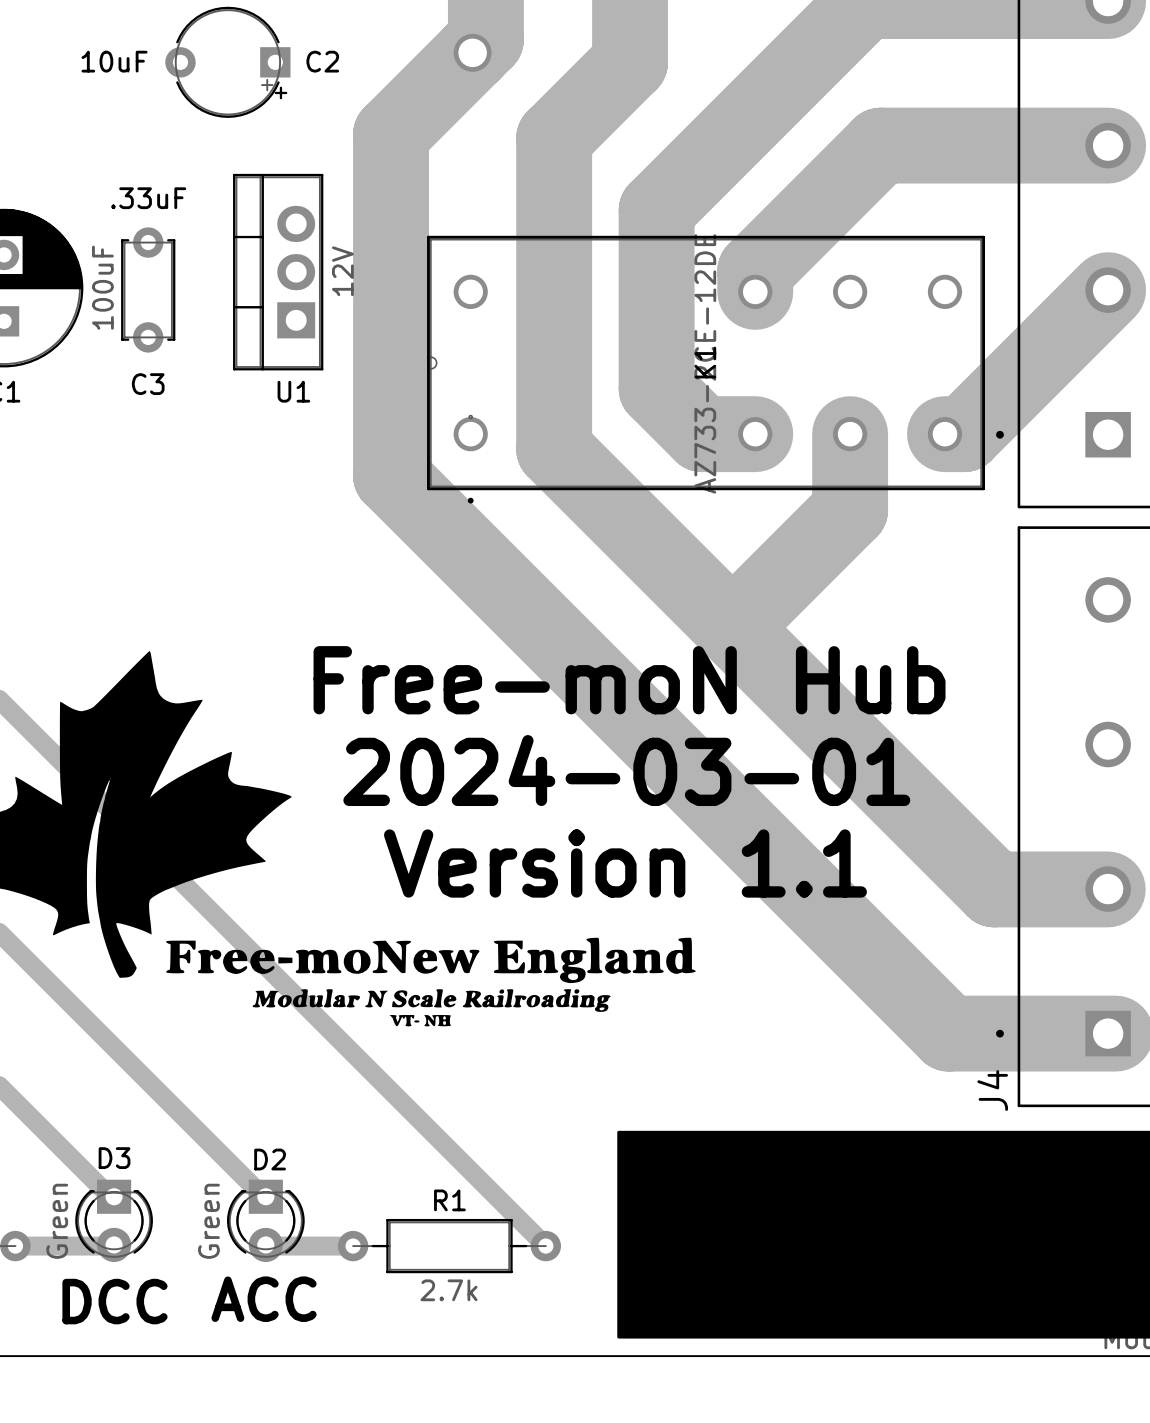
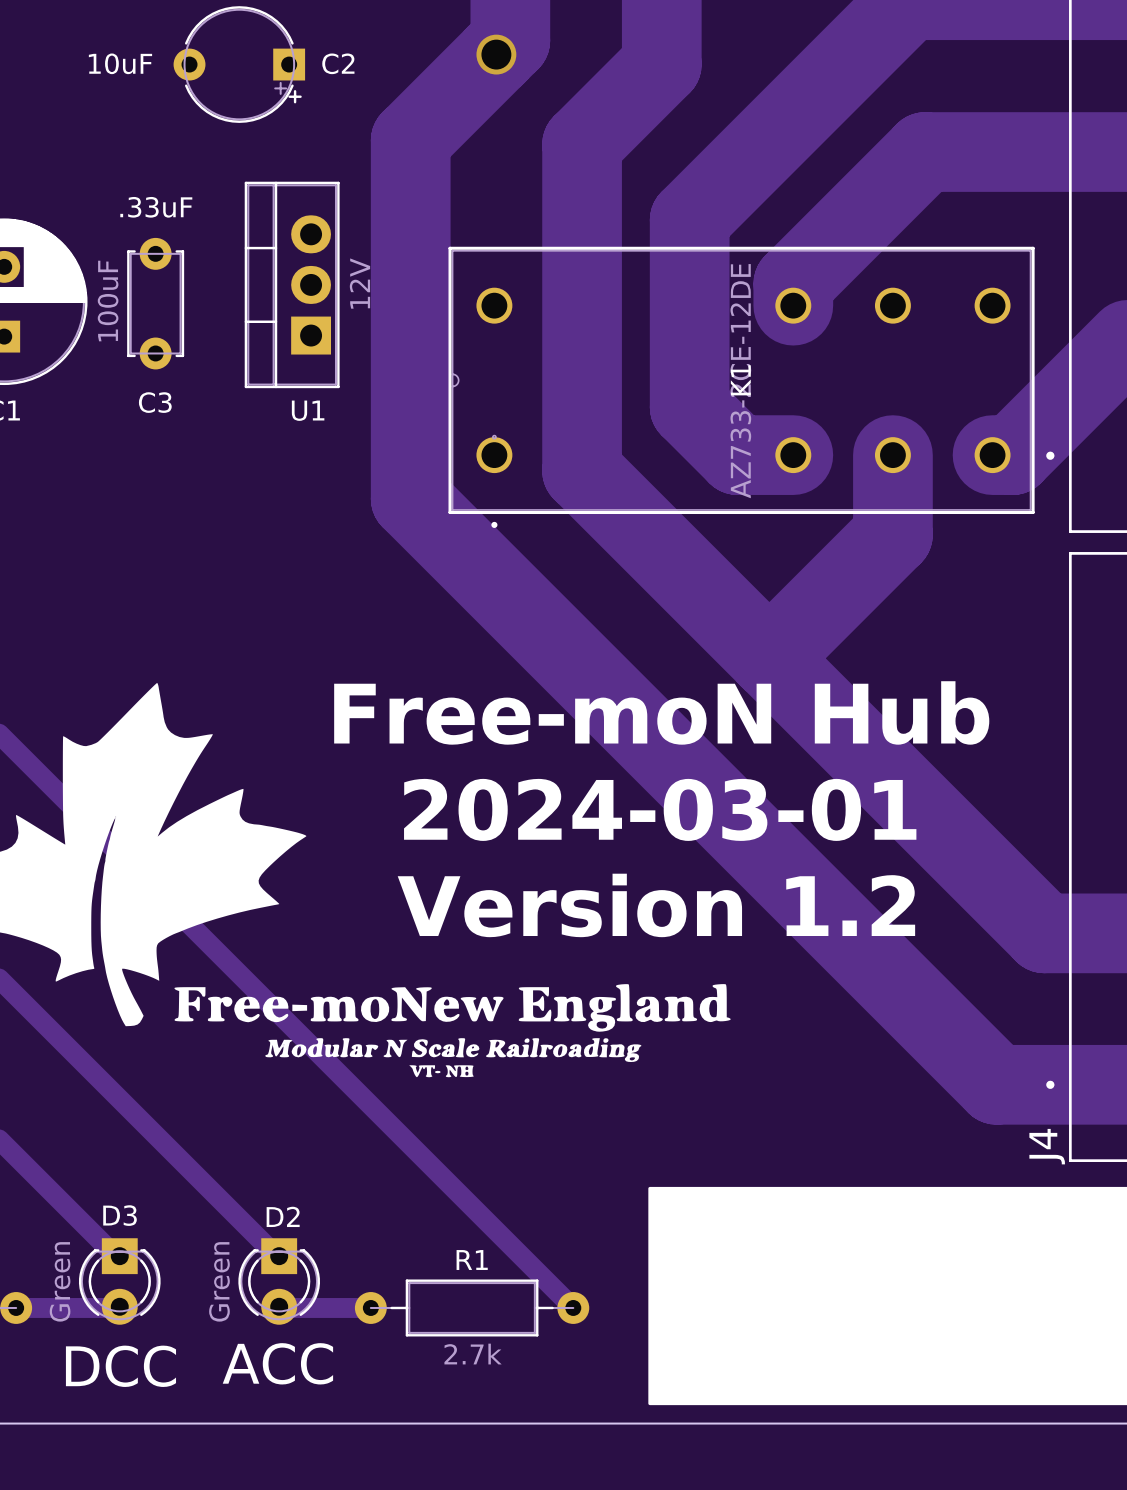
text: Version 1.1 (625, 863) -> Version 1.2 (656, 905)

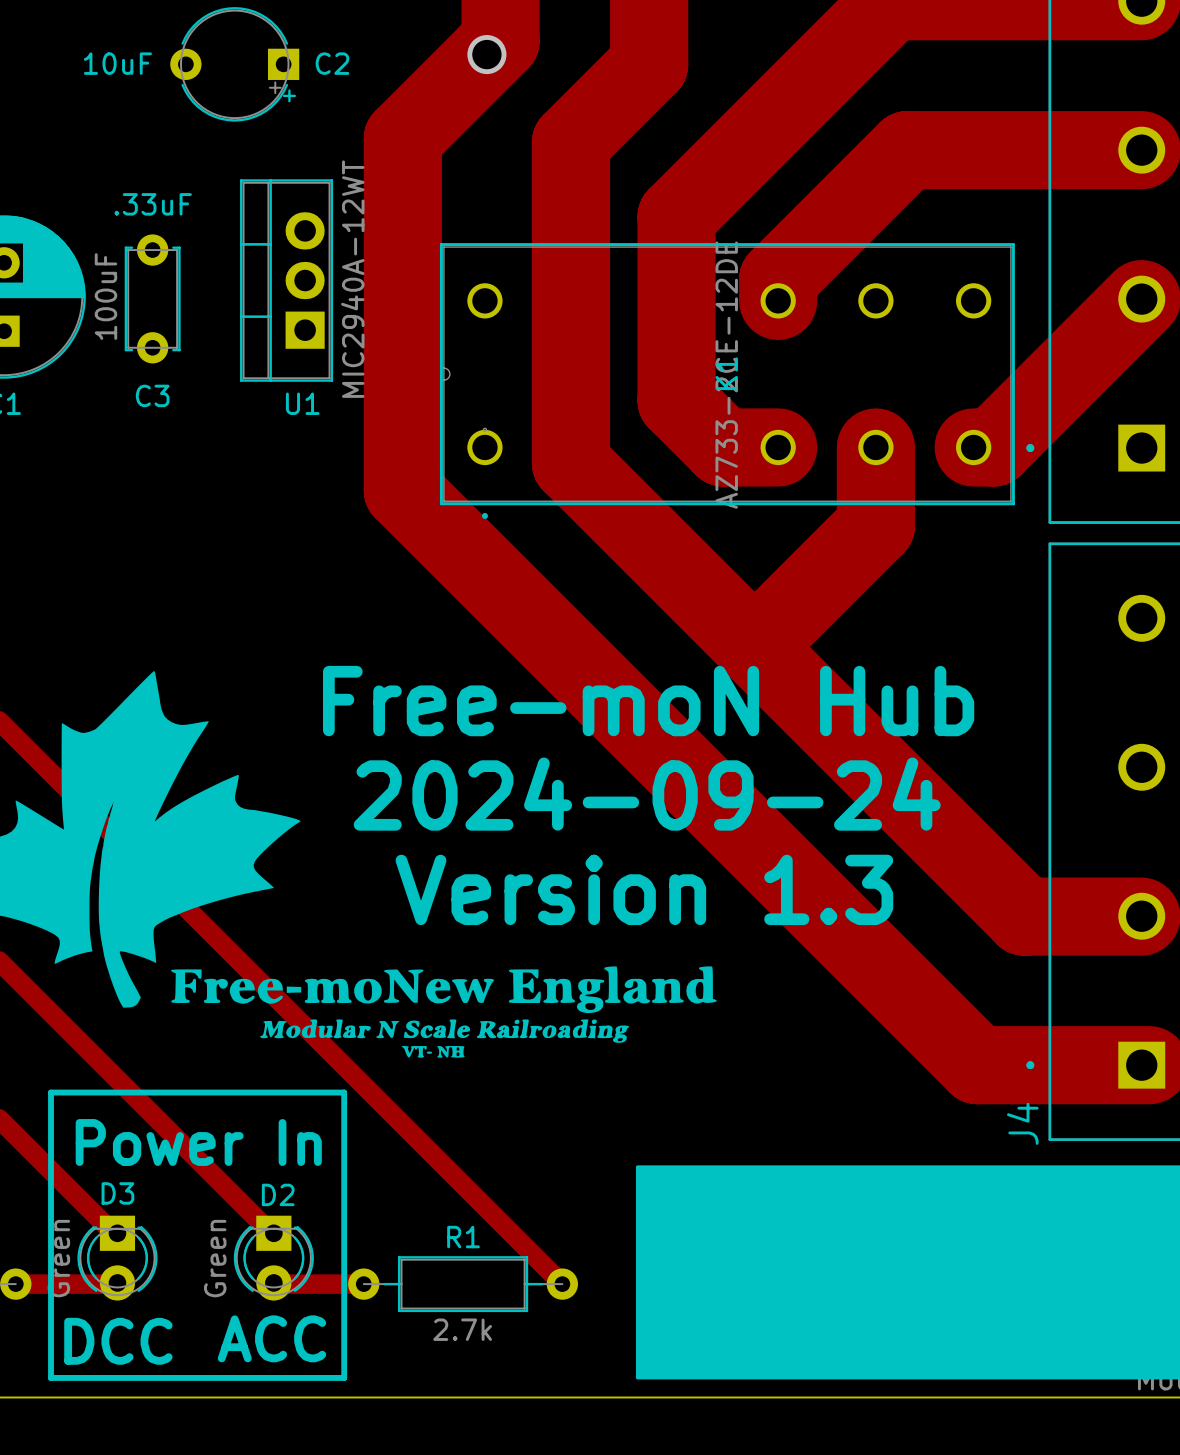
U1 value: 12V (359, 283) -> MIC2940A-12WT (352, 279)
text: 2024-03-01 (660, 809) -> 2024-09-24 (647, 794)
text: Version 1.2 (656, 905) -> Version 1.3 (644, 889)
line: none -> (51, 1092) (344, 1092) (344, 1377) (51, 1377) (51, 1092)
text: none -> Power In (198, 1142)

